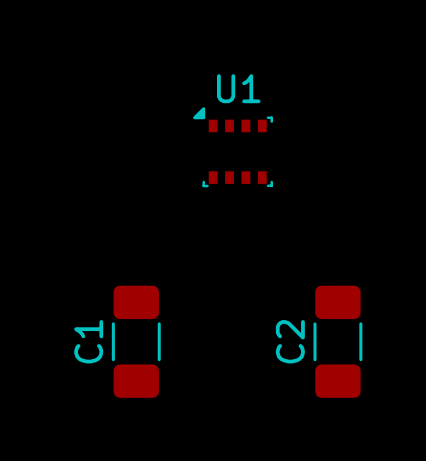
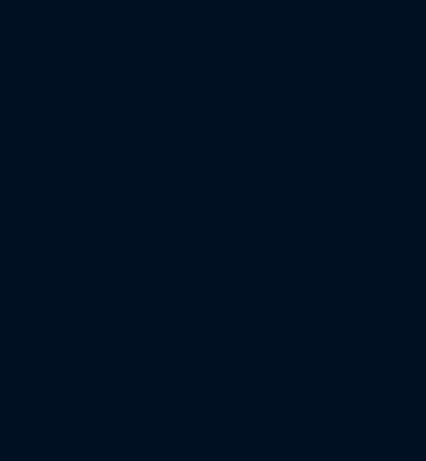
U1: (233, 147) -> none
C1: (136, 341) -> none
C2: (337, 341) -> none

